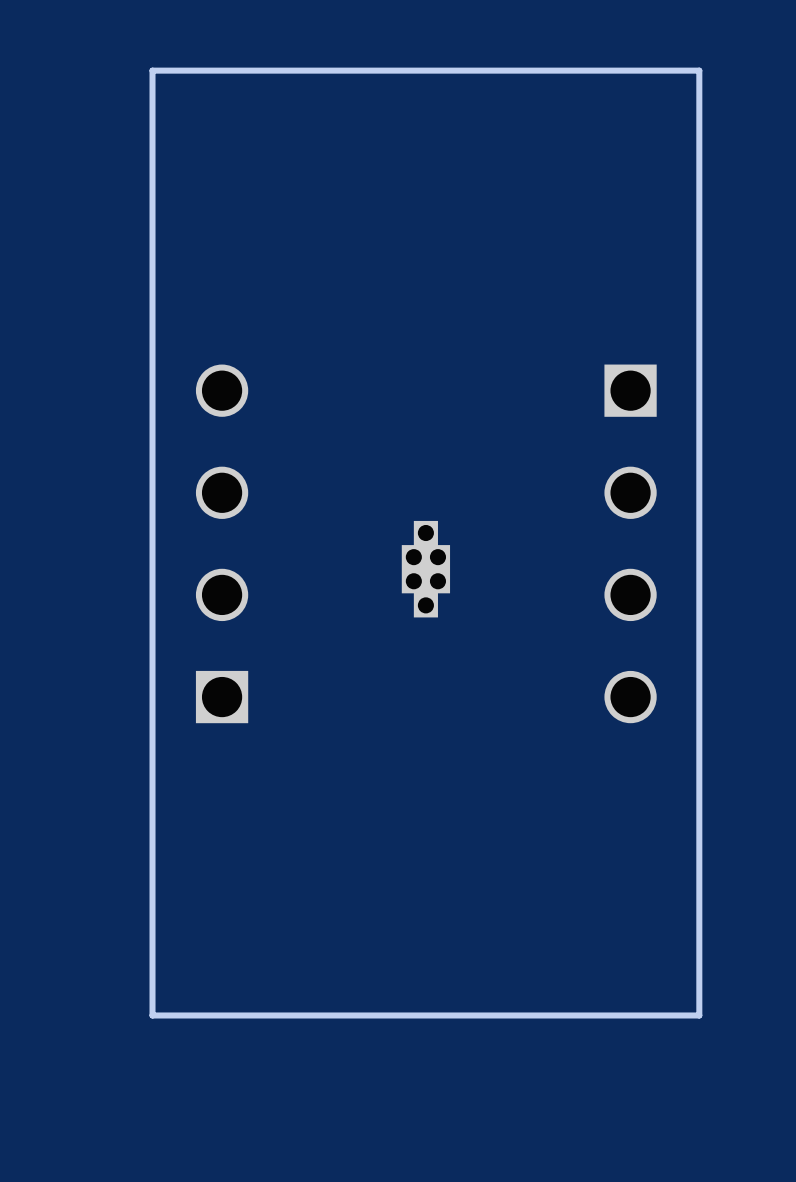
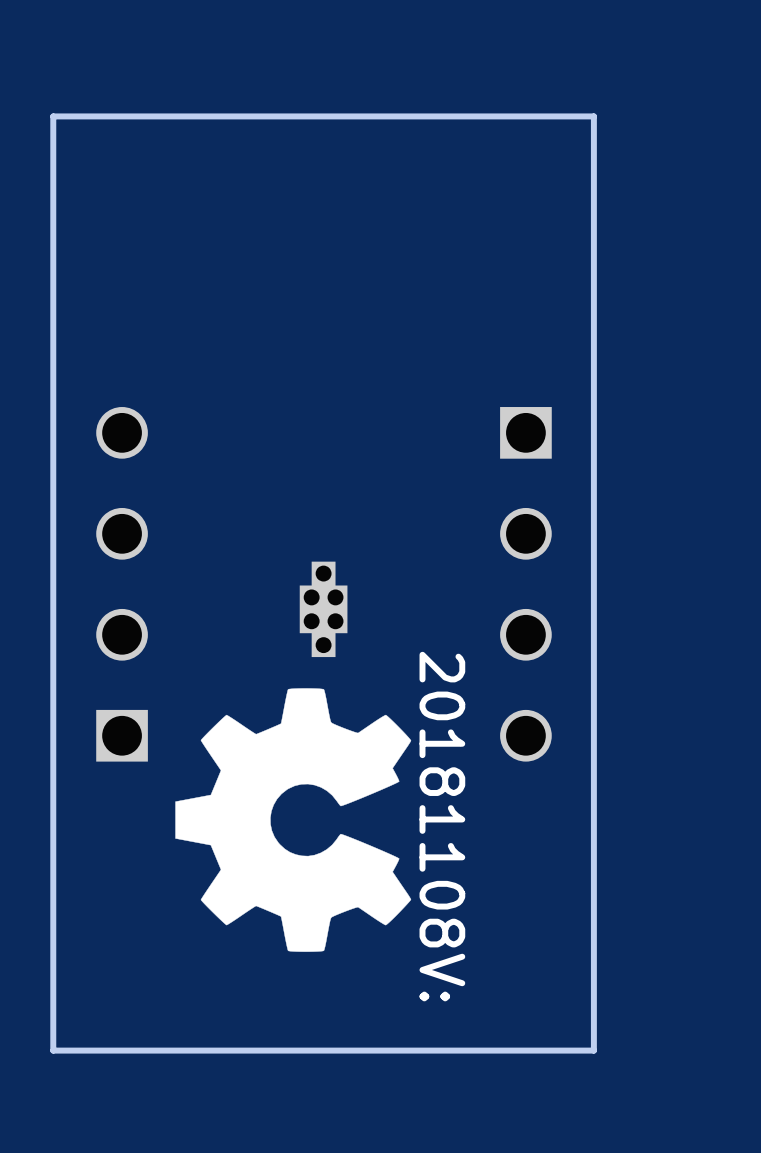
drawing: none -> [175, 688, 412, 952]

